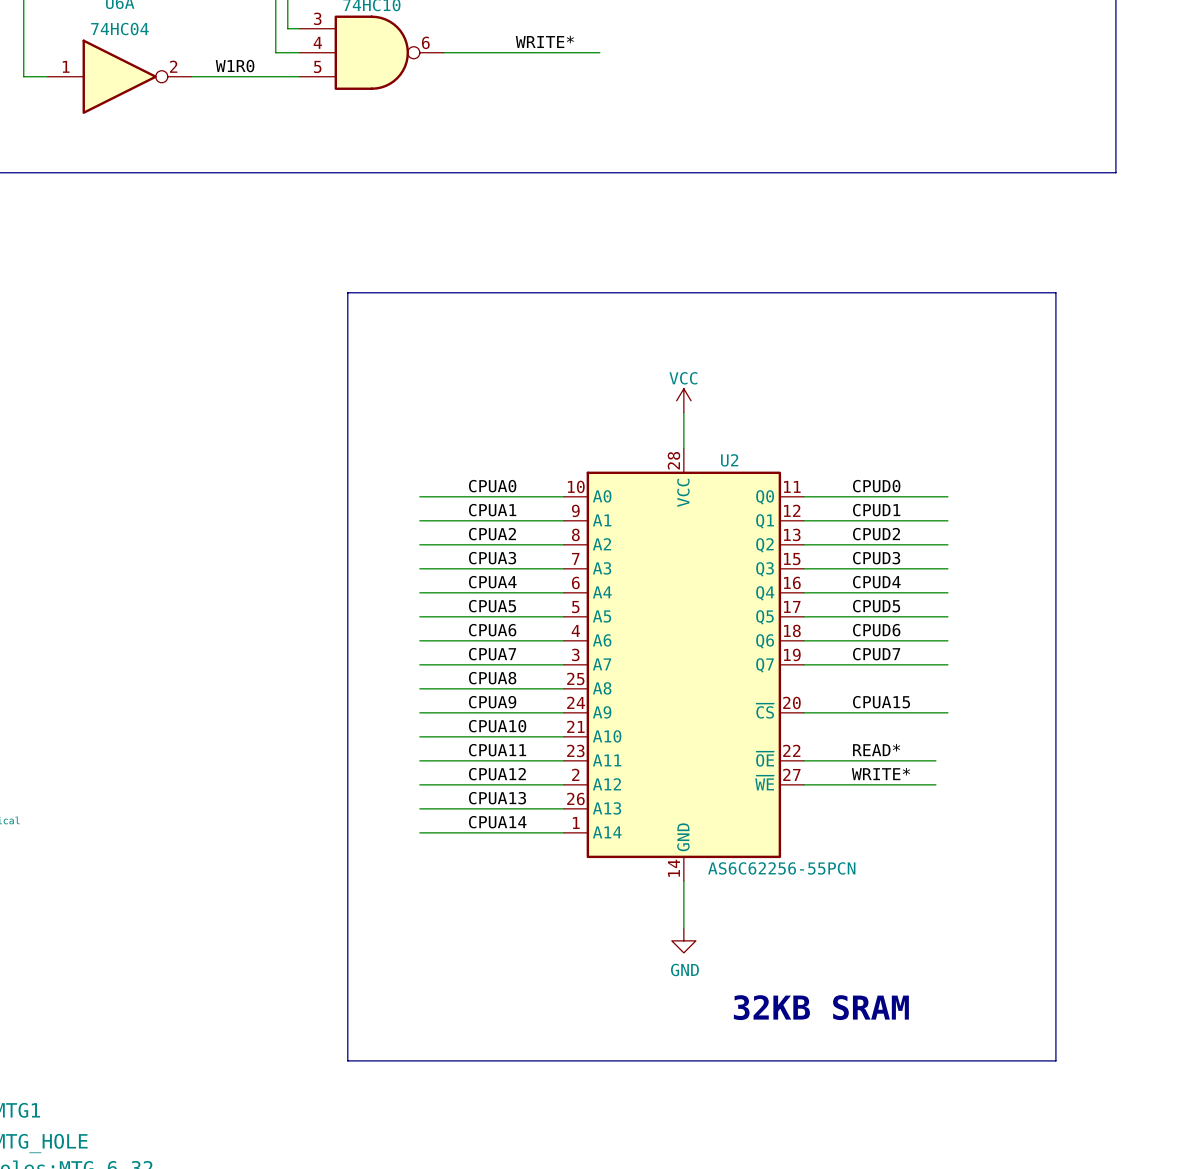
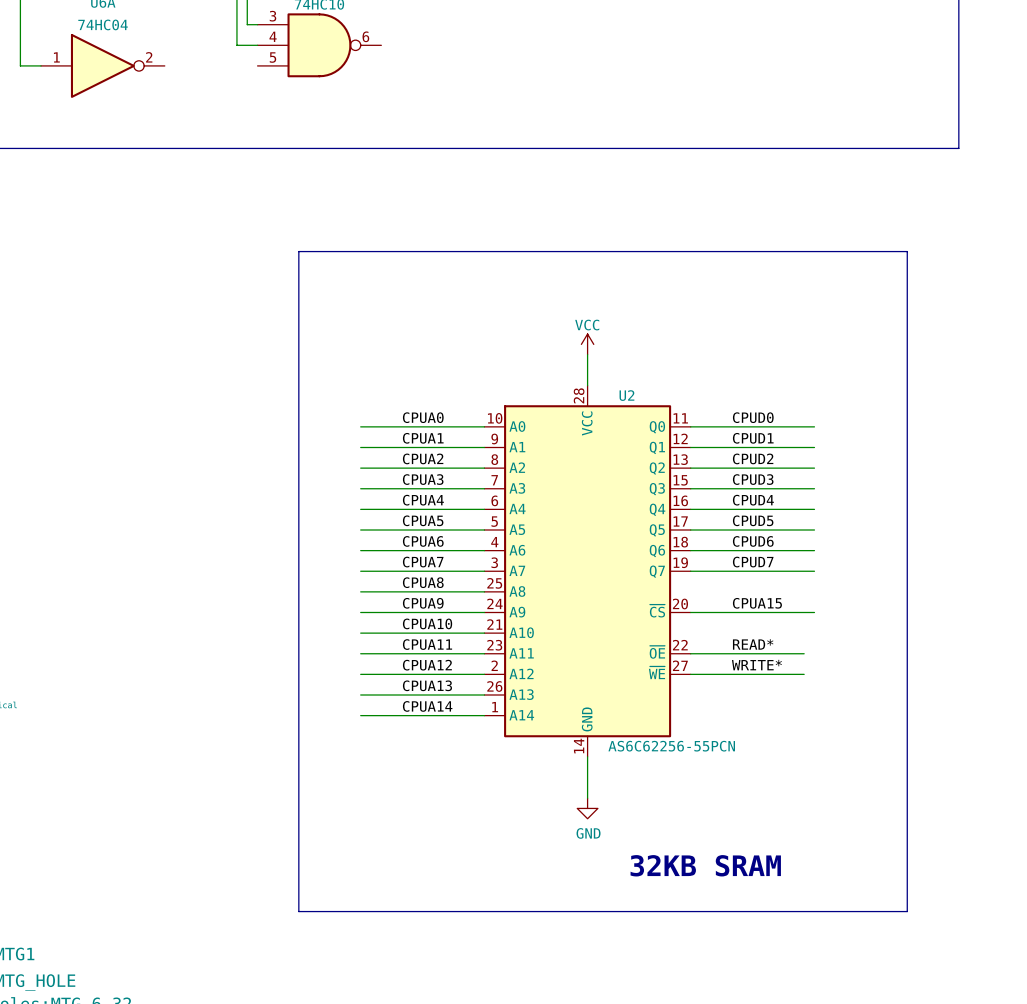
label: WRITE* (544, 41) -> none
wire: (443, 52) (599, 52) -> none
label: W1R0 (235, 66) -> none
wire: (191, 76) (299, 76) -> none

